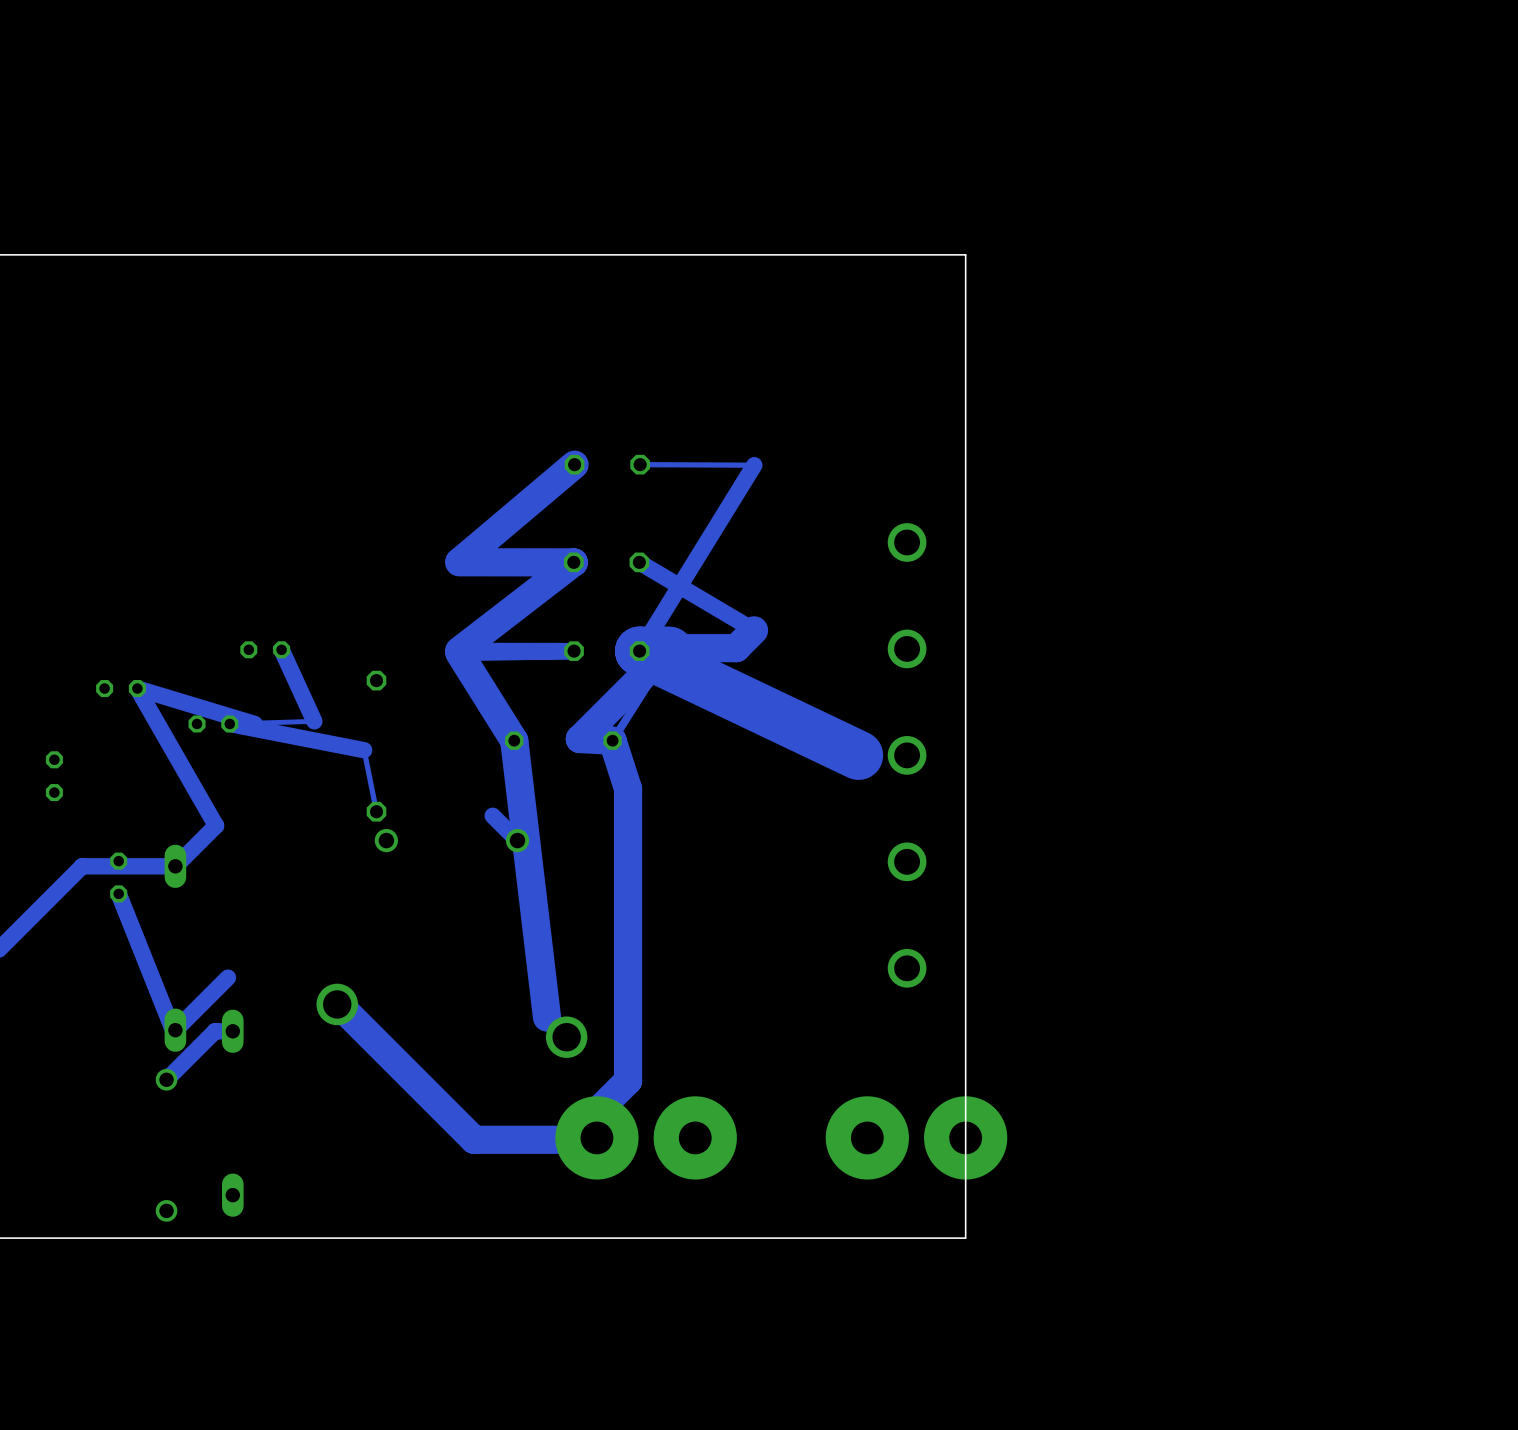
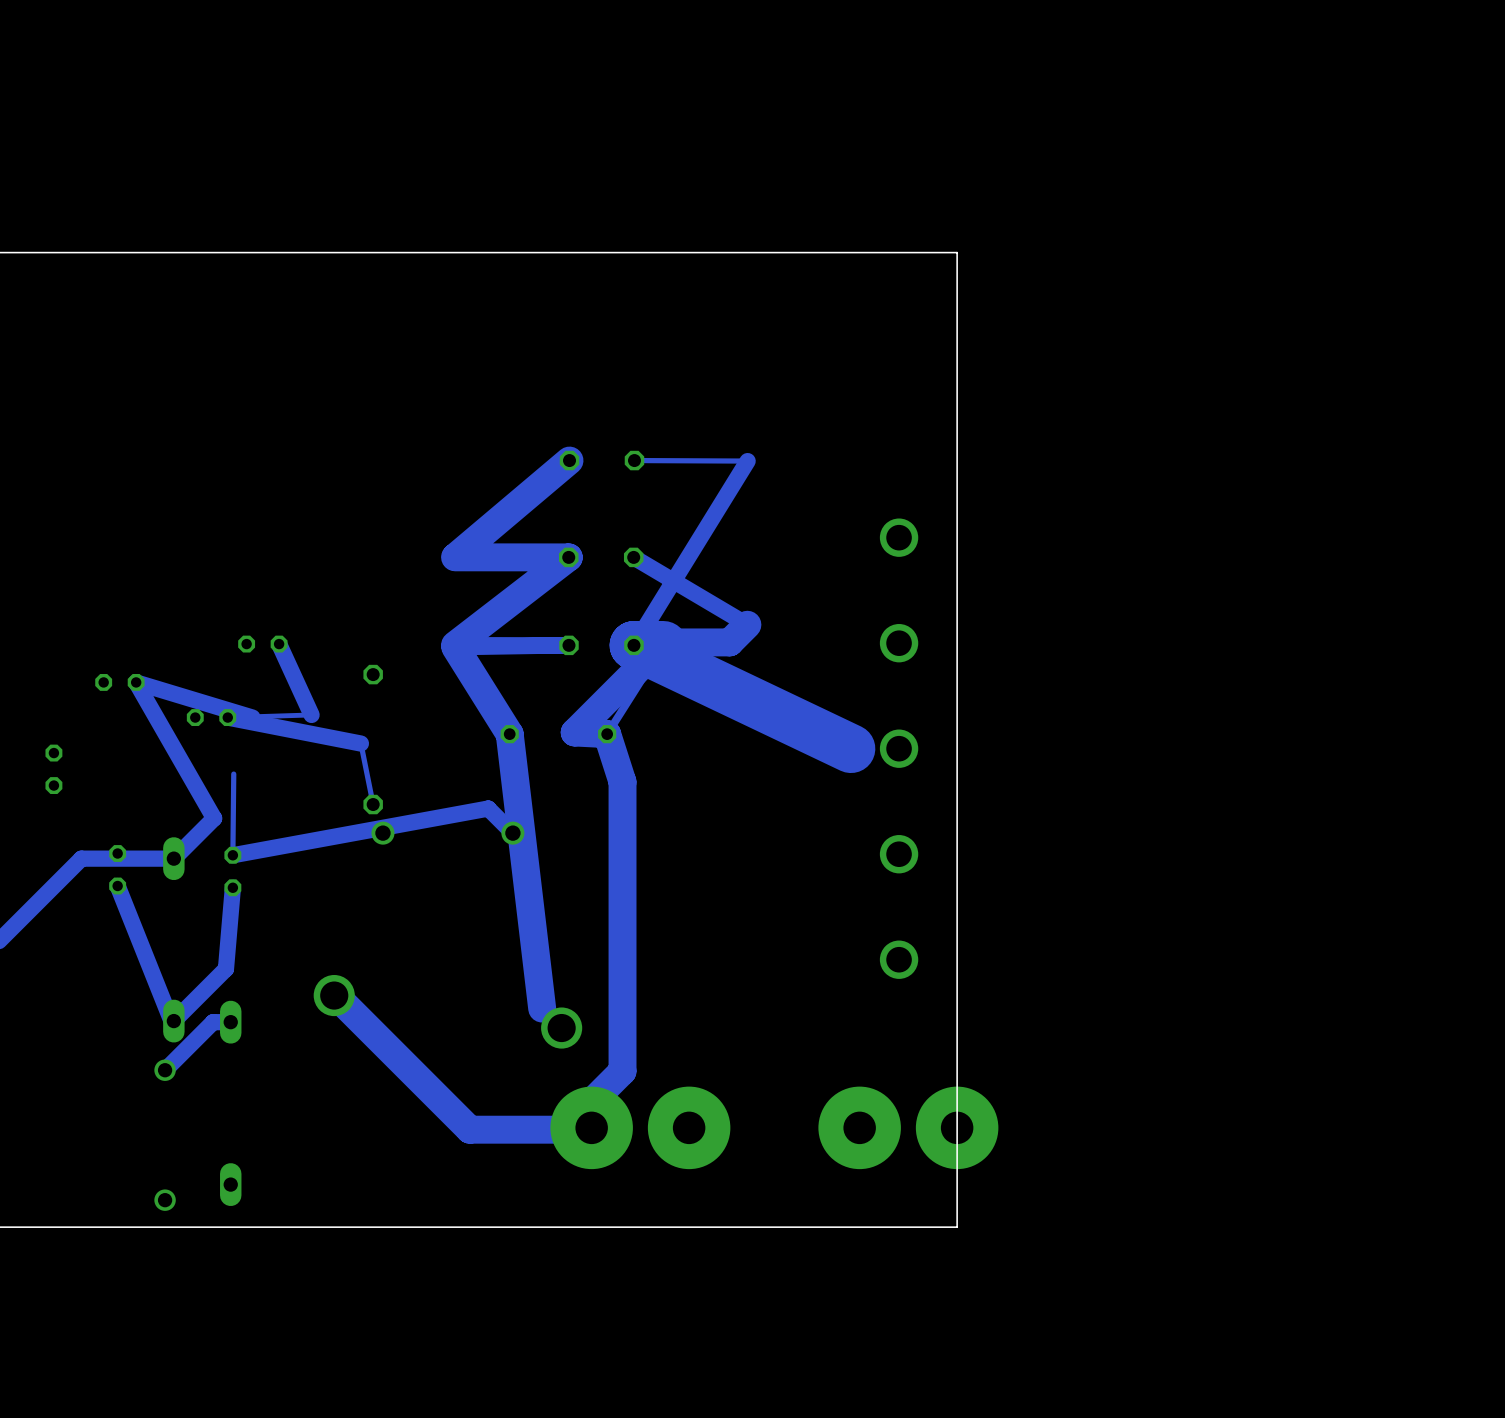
bottom track: none -> (233, 774) (232, 855) (488, 808)
part: none -> (232, 871)
bottom track: none -> (232, 887) (225, 968)

